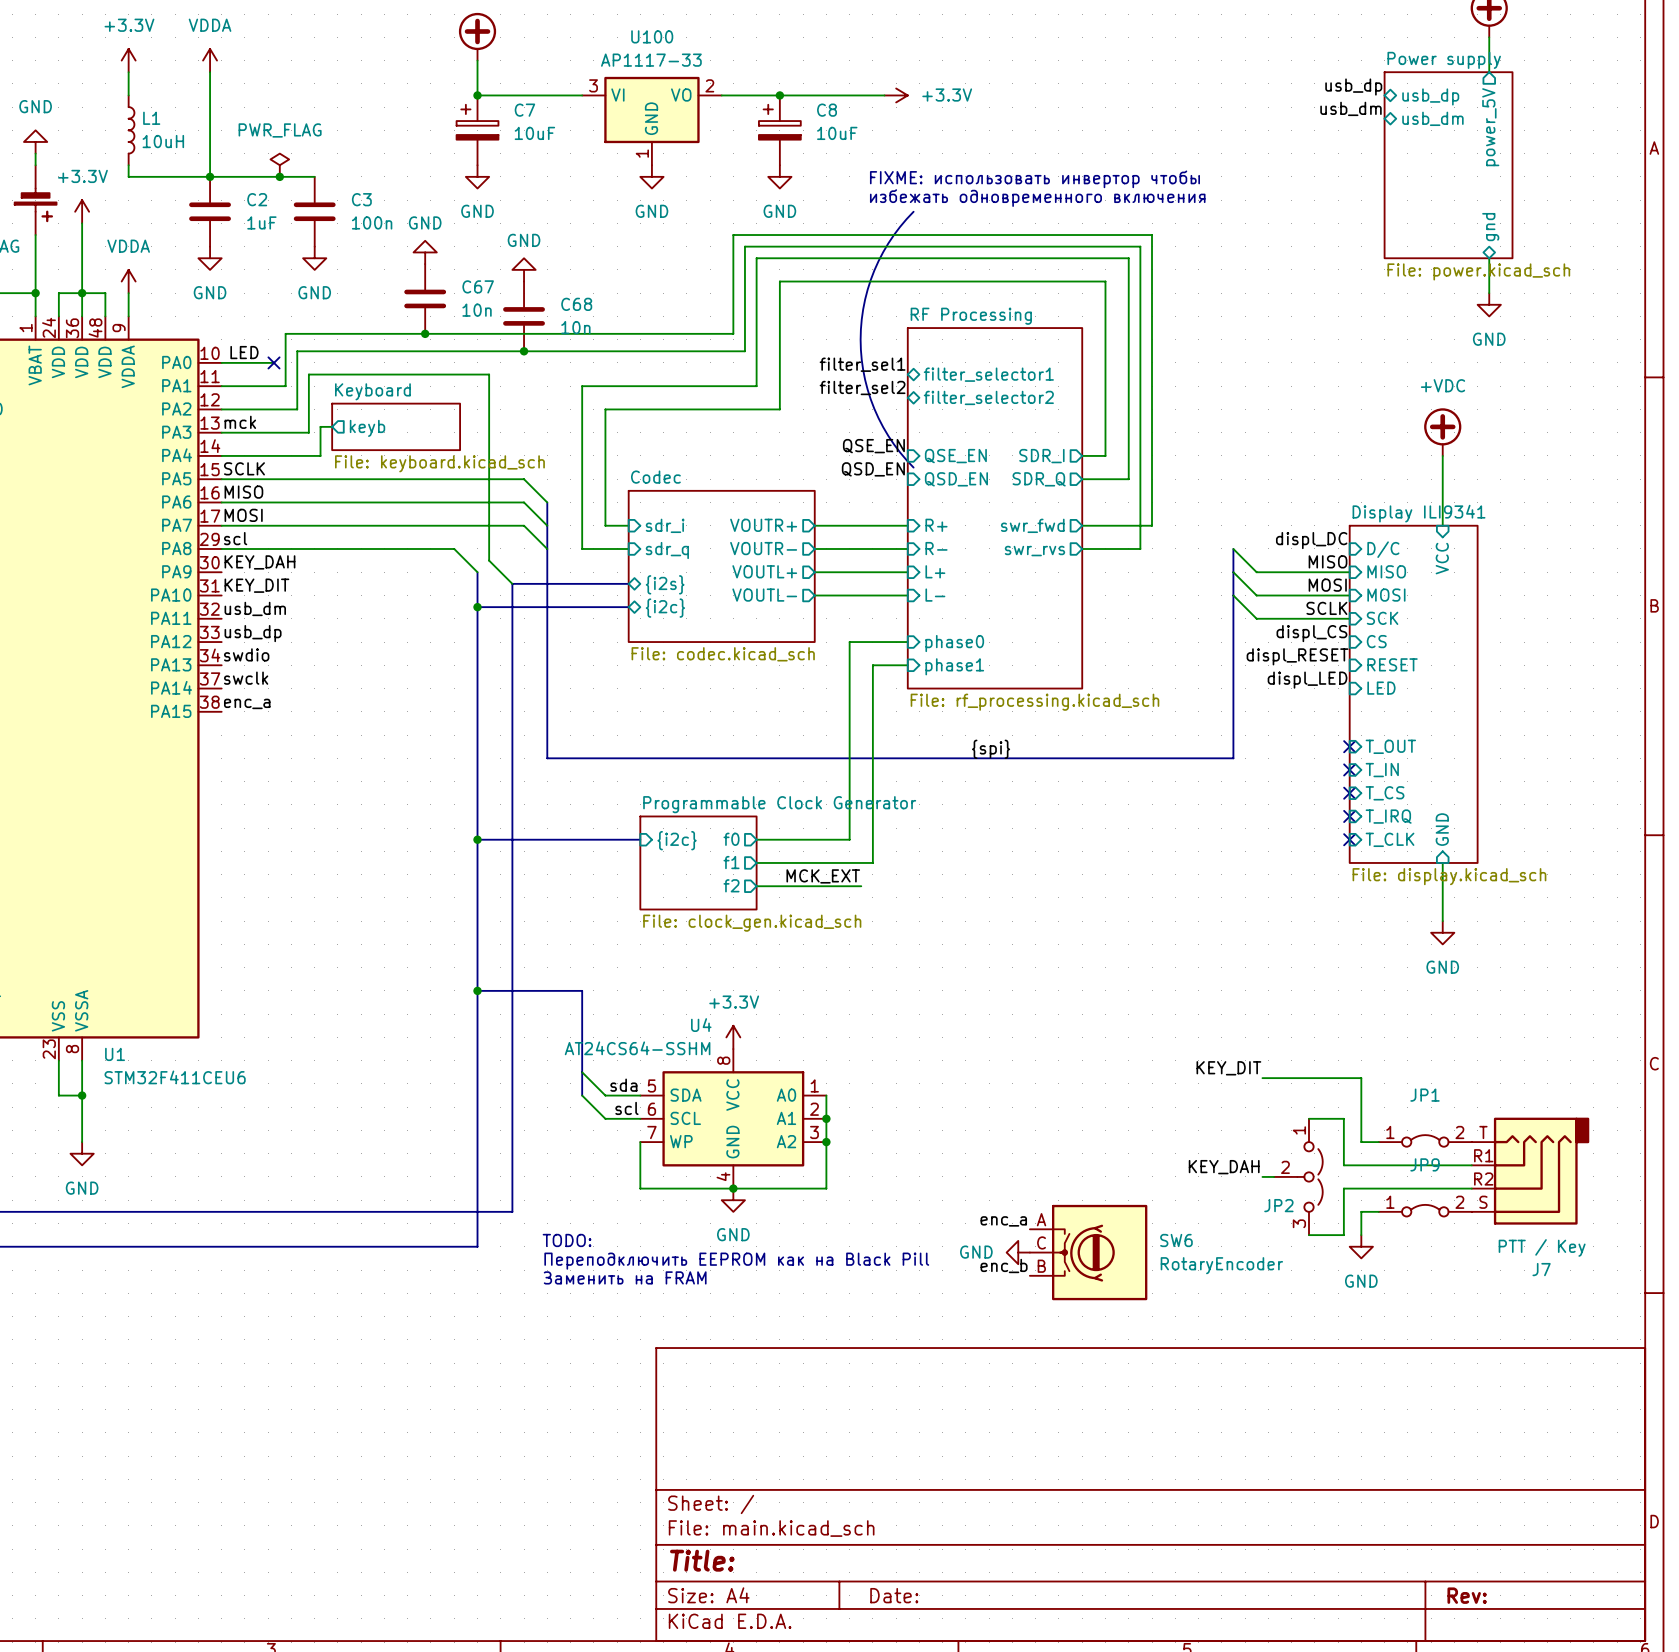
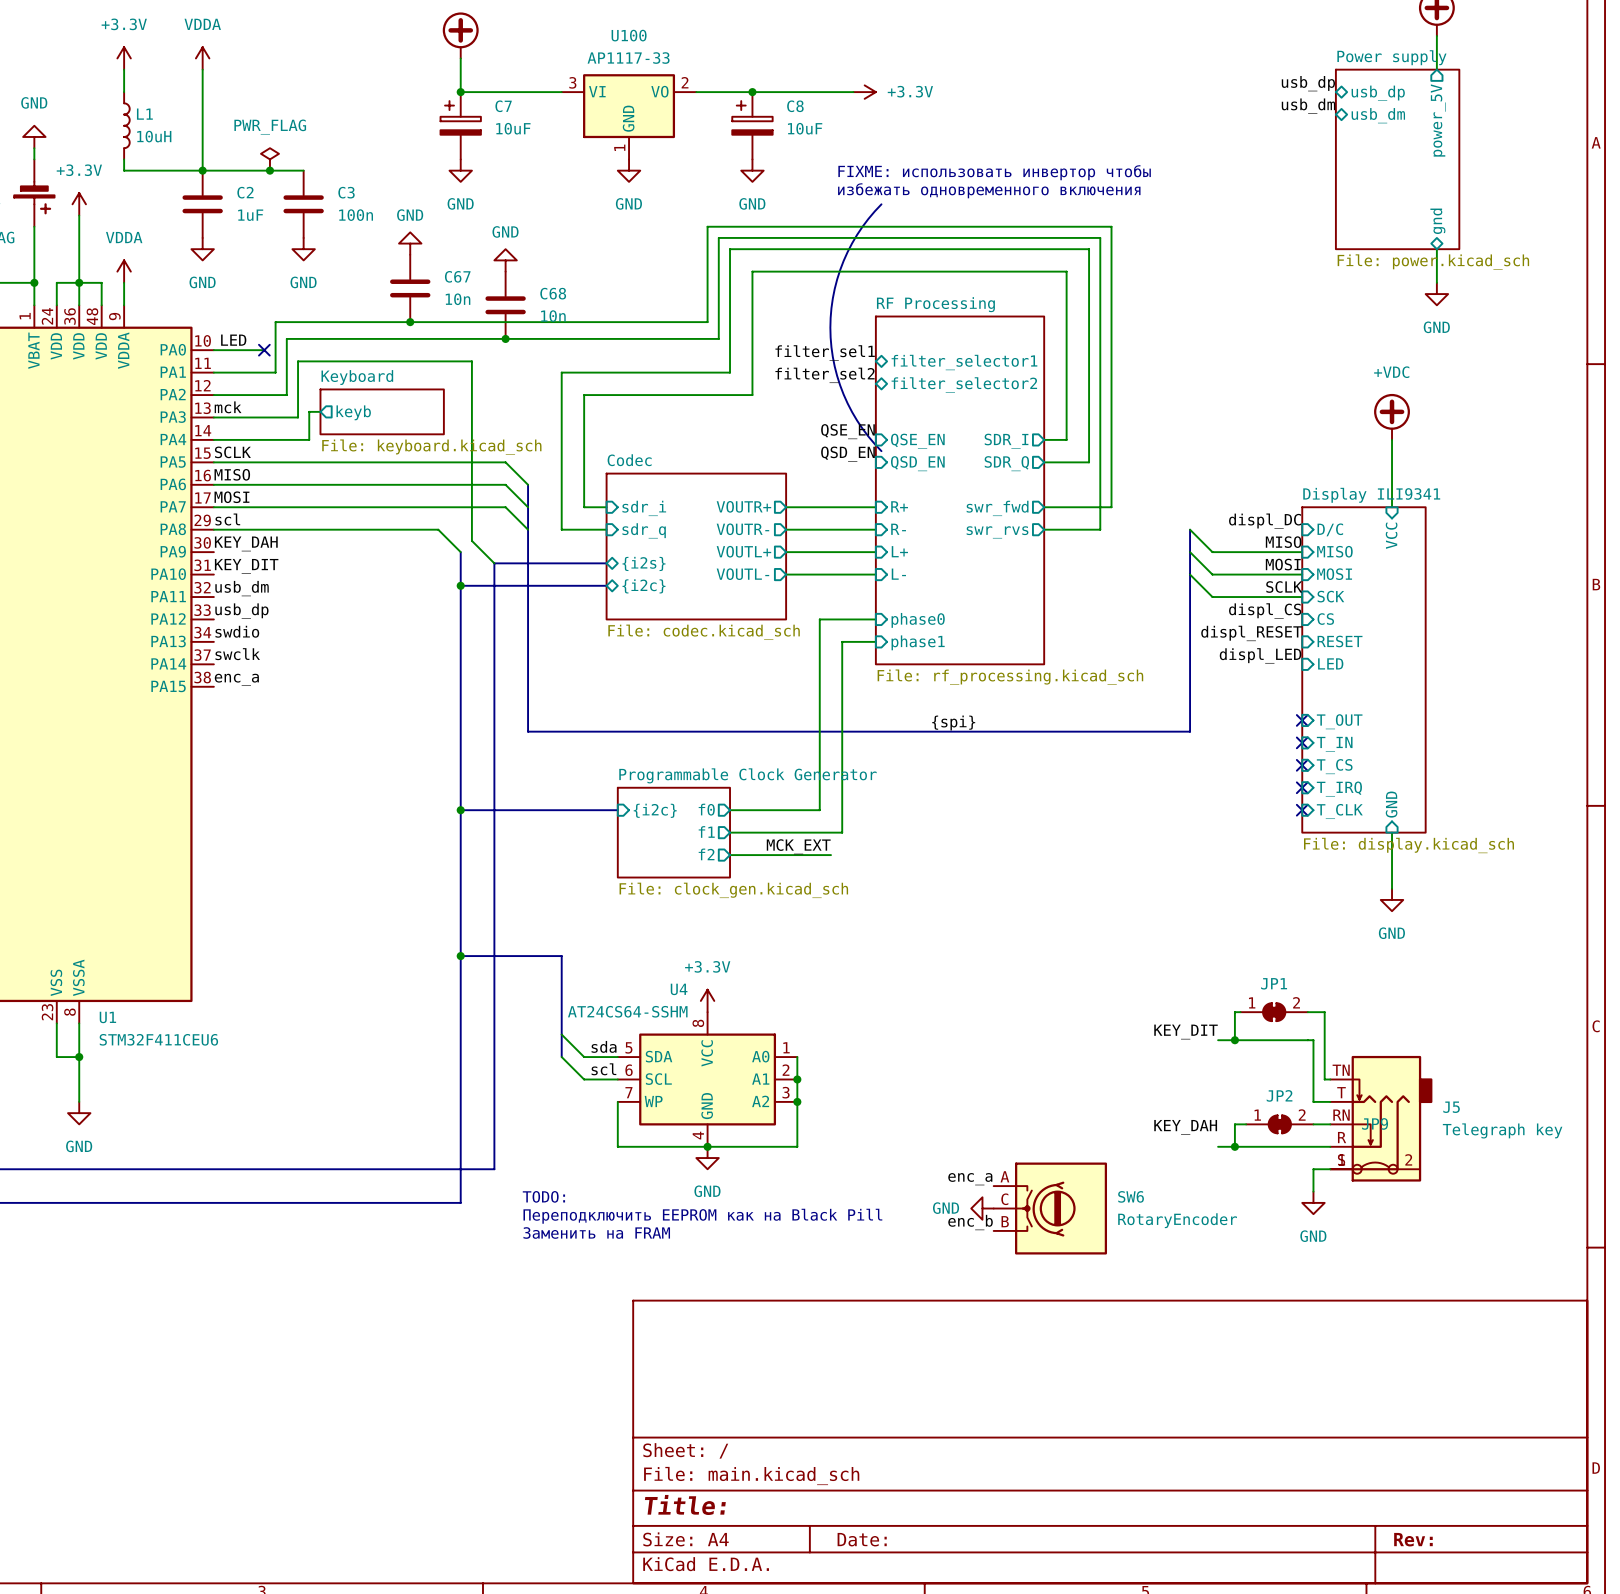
wire: none -> (1240, 1012) (1234, 1012) (1234, 1040)
wire: none -> (1307, 1012) (1324, 1012) (1324, 1079) (1330, 1079)
junction: none -> (1234, 1040)
JP2 symbol: [1274, 1118, 1323, 1236] -> [1246, 1115, 1314, 1134]
wire: (1308, 1118) (1343, 1118) (1343, 1165) (1361, 1165) -> none
JP1 symbol: [1378, 1135, 1472, 1147] -> [1240, 1003, 1308, 1022]
J5: none -> Telegraph key (1381, 1118)
wire: none -> (1246, 1124) (1234, 1124) (1234, 1146)
J7: PTT / Key (1530, 1171) -> none
wire: (1262, 1176) (1274, 1176) -> none
junction: none -> (1234, 1146)
wire: (1343, 1188) (1343, 1235) (1308, 1235) -> (1296, 1146) (1218, 1146)
JP2 name position: JP2 (1278, 1205) -> JP2 (1279, 1095)

